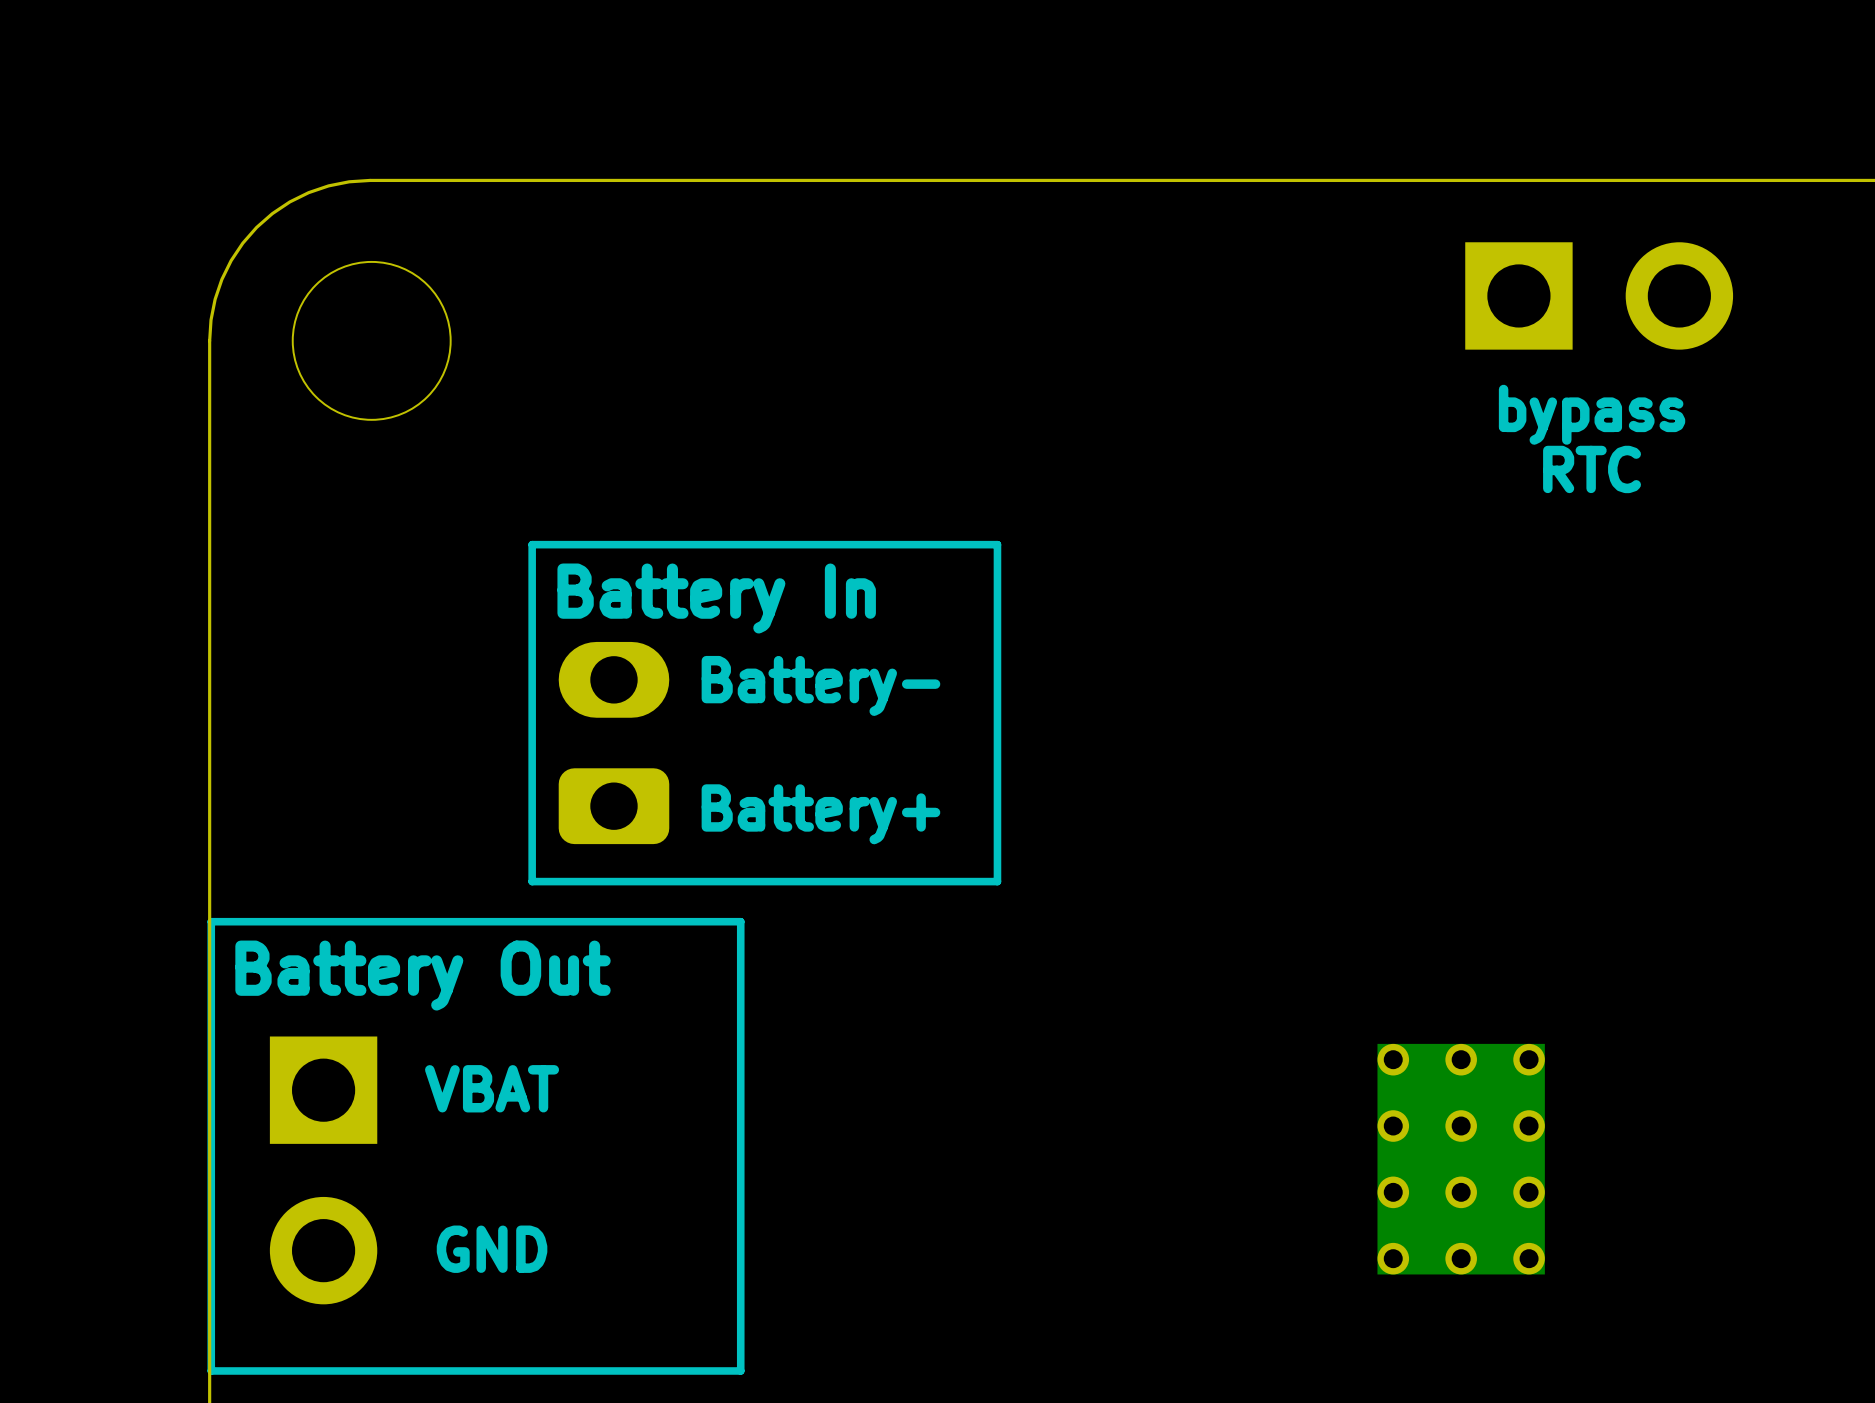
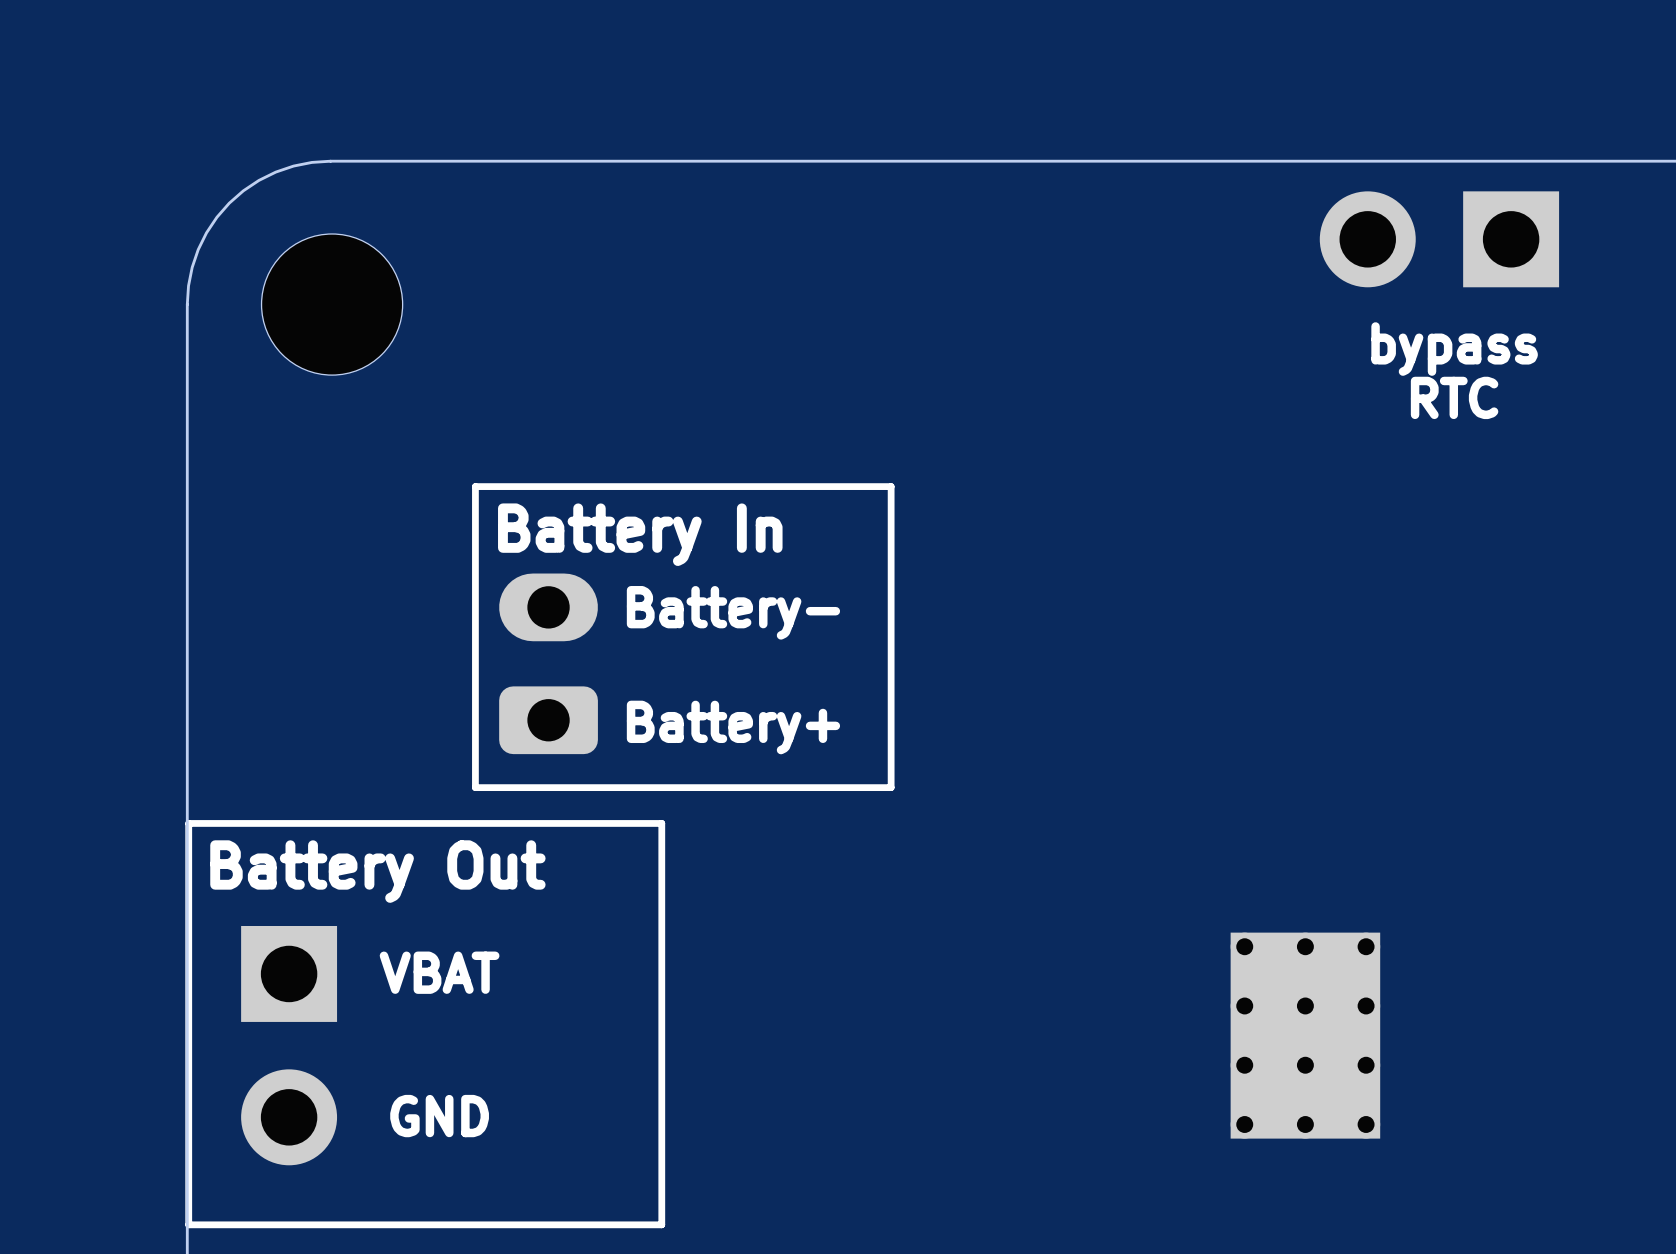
part rotation: 0° (1599, 295) -> 180° (1439, 239)
text position: bypass (1592, 414) -> bypass (1454, 349)
text position: RTC (1592, 469) -> RTC (1454, 397)

